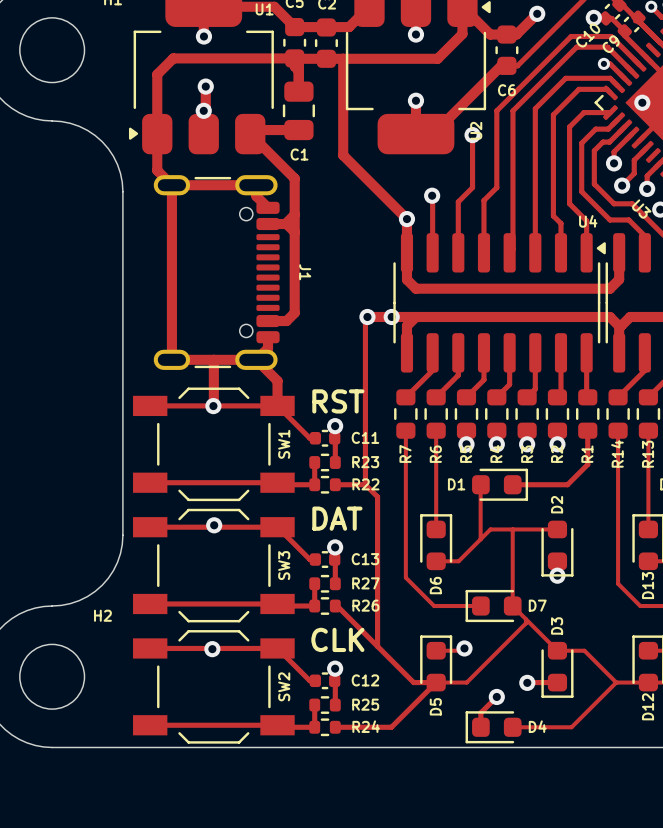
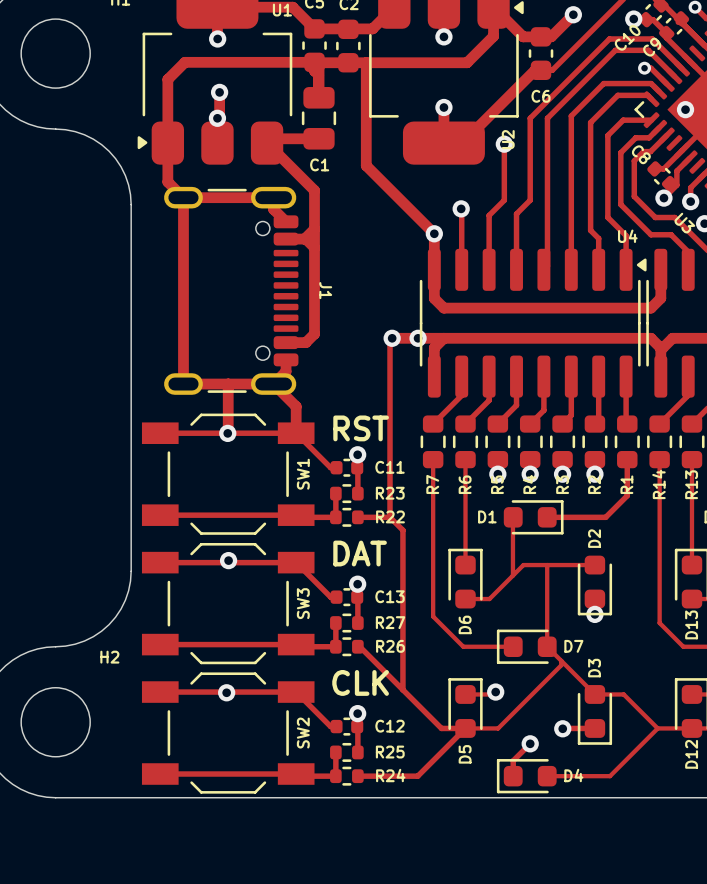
track: (631, 134) (614, 151) (614, 163) -> none
track: none -> (682, 150) (663, 168) (654, 168)
via: (614, 163) -> none
C8: none -> (662, 176)

